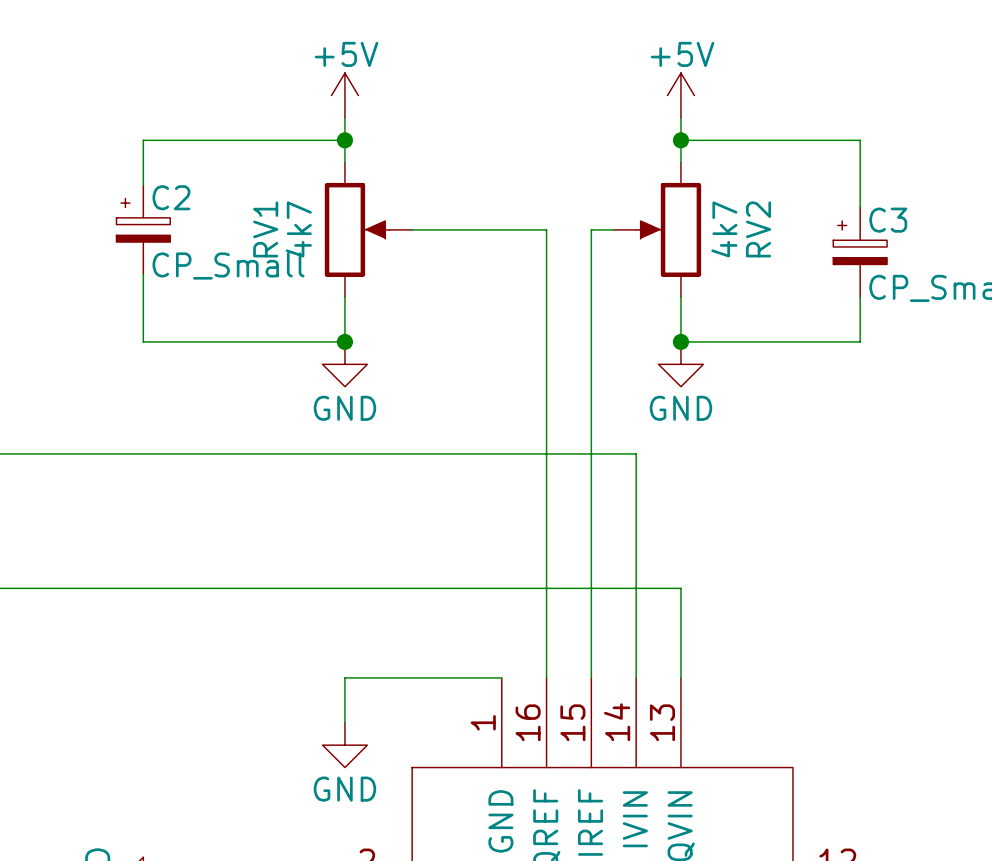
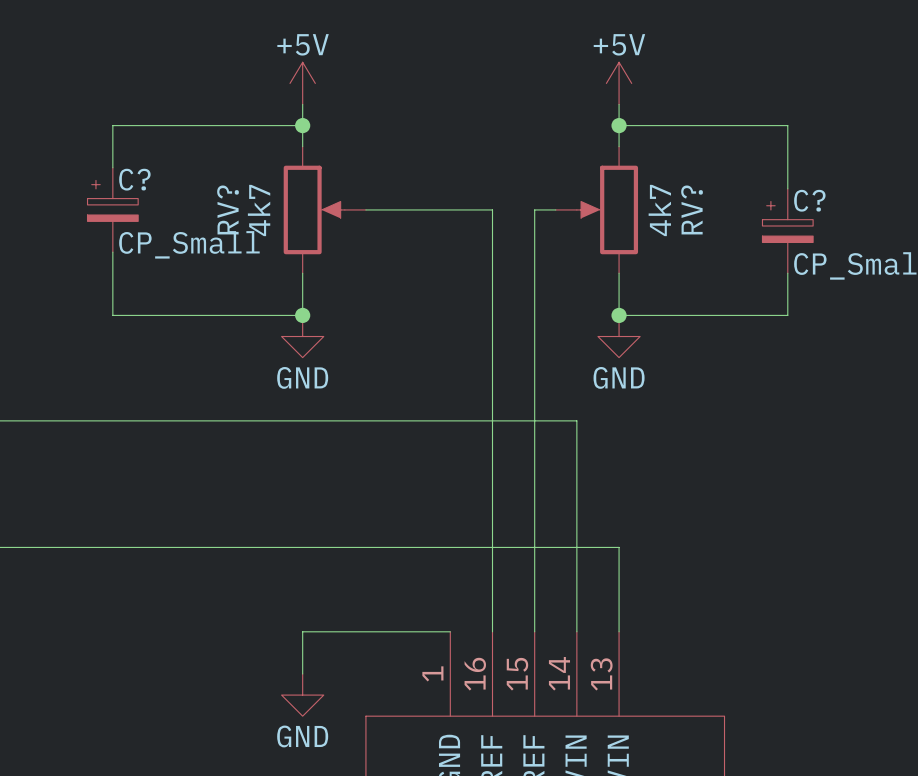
C2 name: C2 (171, 197) -> C? (134, 179)
C3 name: C3 (888, 220) -> C? (809, 200)
RV1 name: RV1 (265, 229) -> RV? (228, 209)
RV2 name: RV2 (758, 229) -> RV? (692, 209)

